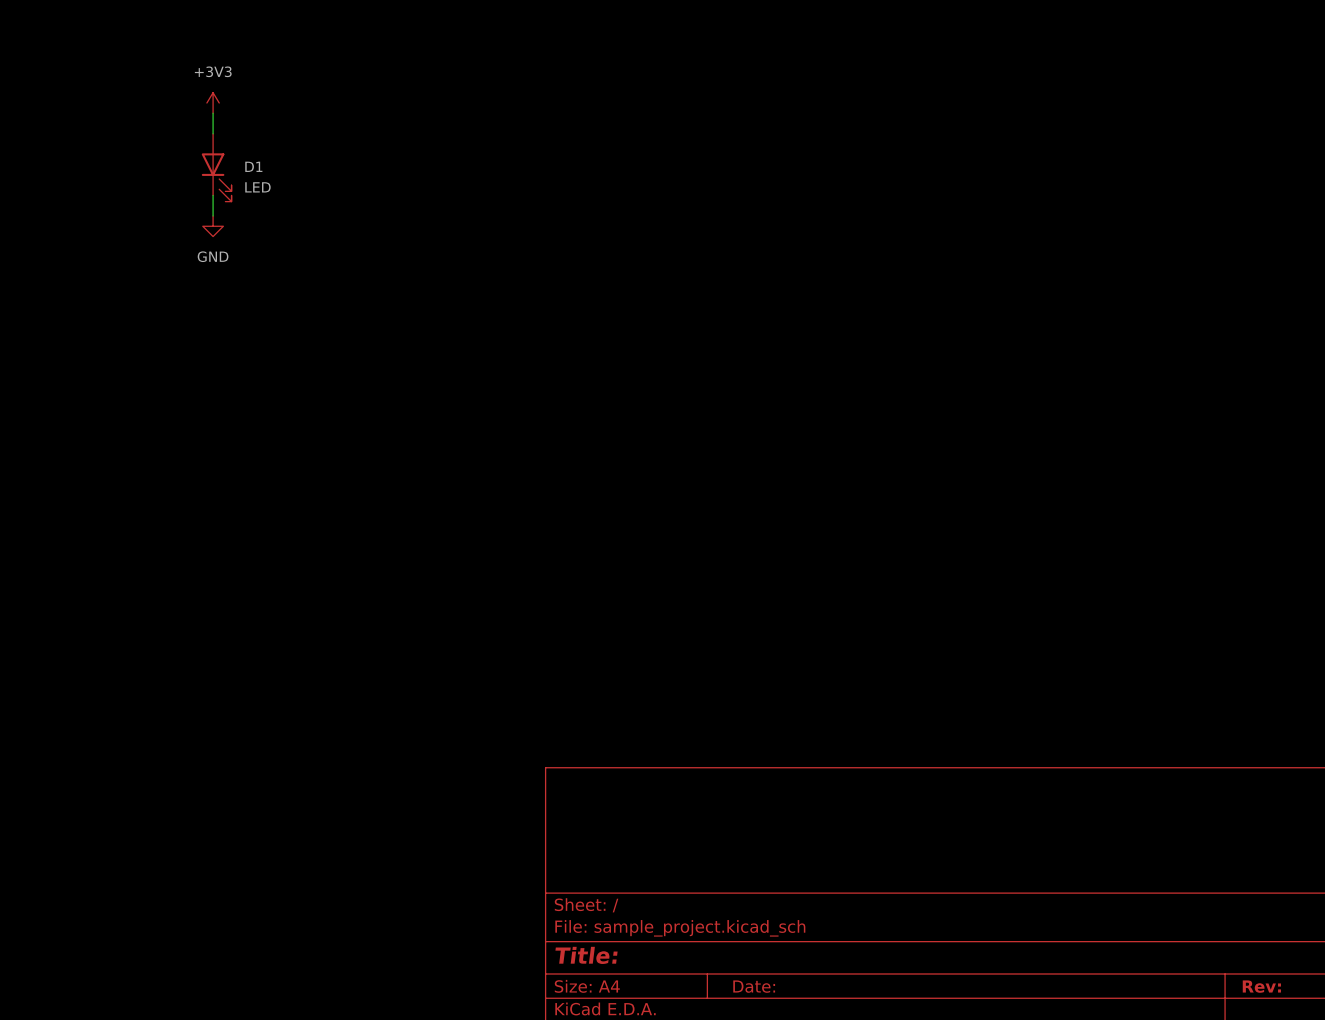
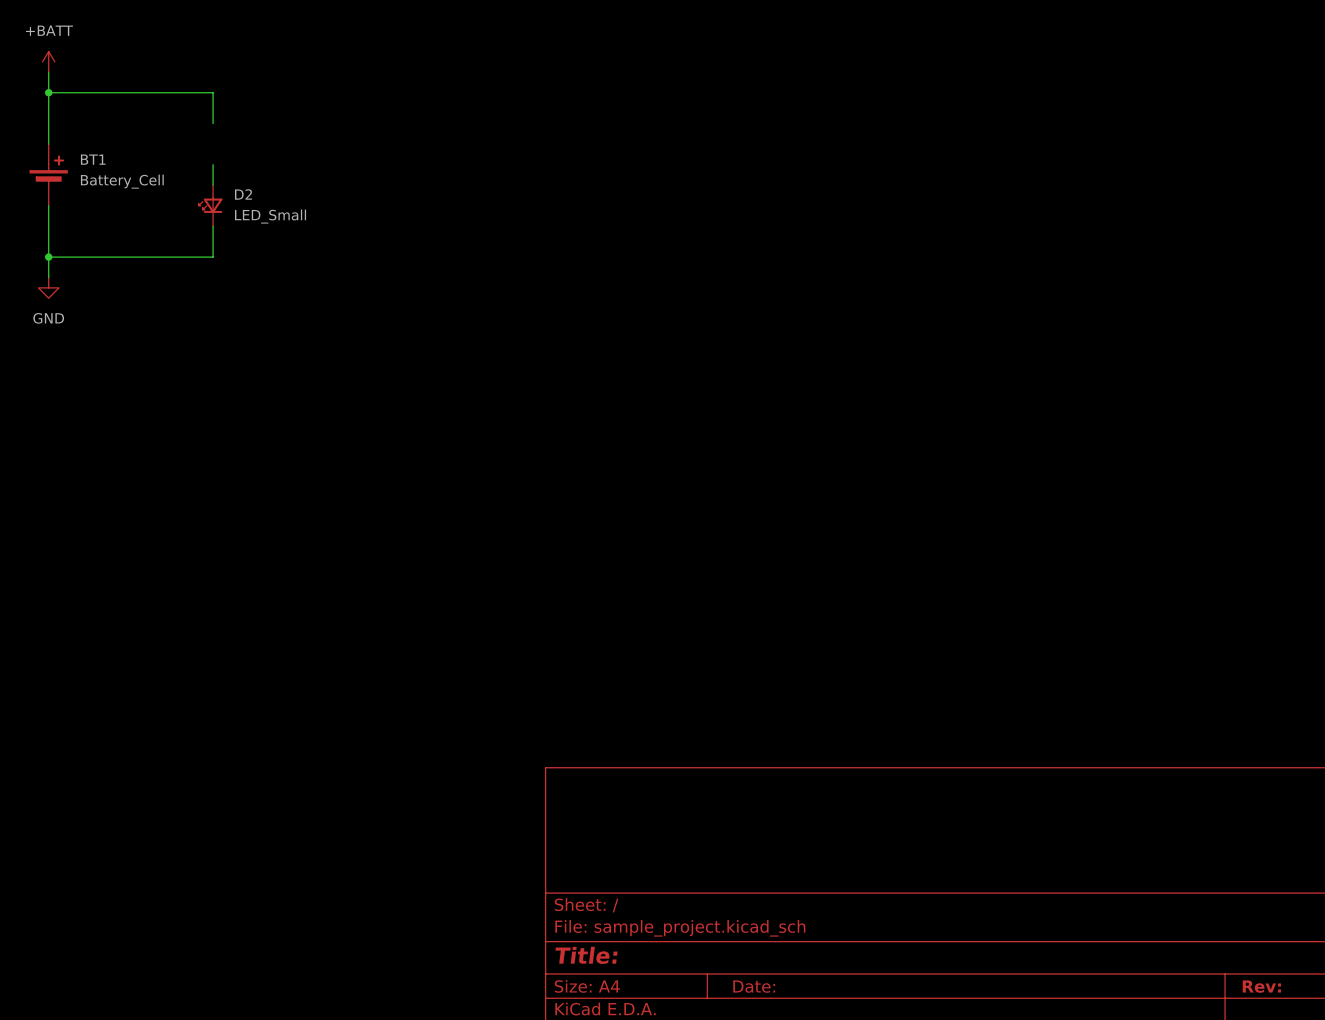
power symbol: none -> +BATT (48, 61)
wire: none -> (48, 72) (48, 144)
wire: none -> (48, 92) (213, 92) (213, 113)
junction: none -> (48, 92)
power symbol: +3V3 (213, 103) -> none
wire: (213, 123) (213, 133) -> none
D1: LED (216, 167) -> none
BT1: none -> Battery_Cell (48, 174)
wire: none -> (48, 205) (48, 277)
D2: none -> LED_Small (210, 205)
wire: none -> (213, 226) (213, 257) (48, 257)
power symbol position: GND (213, 226) -> GND (48, 287)
junction: none -> (48, 257)

